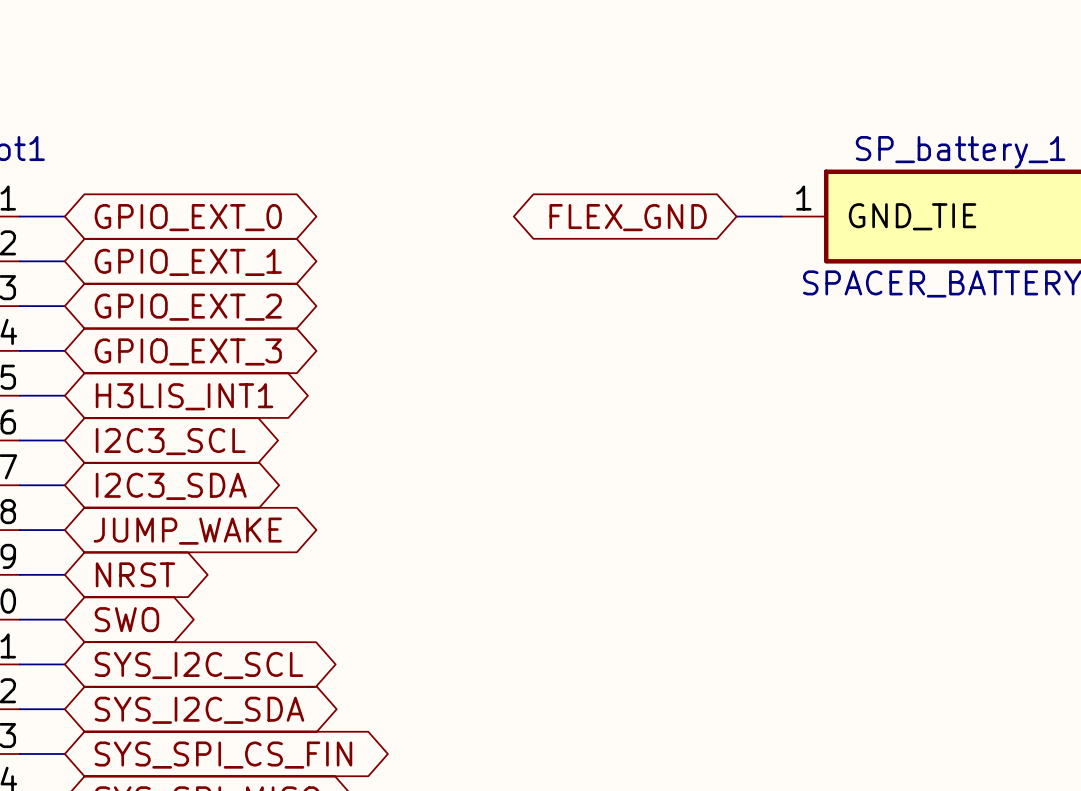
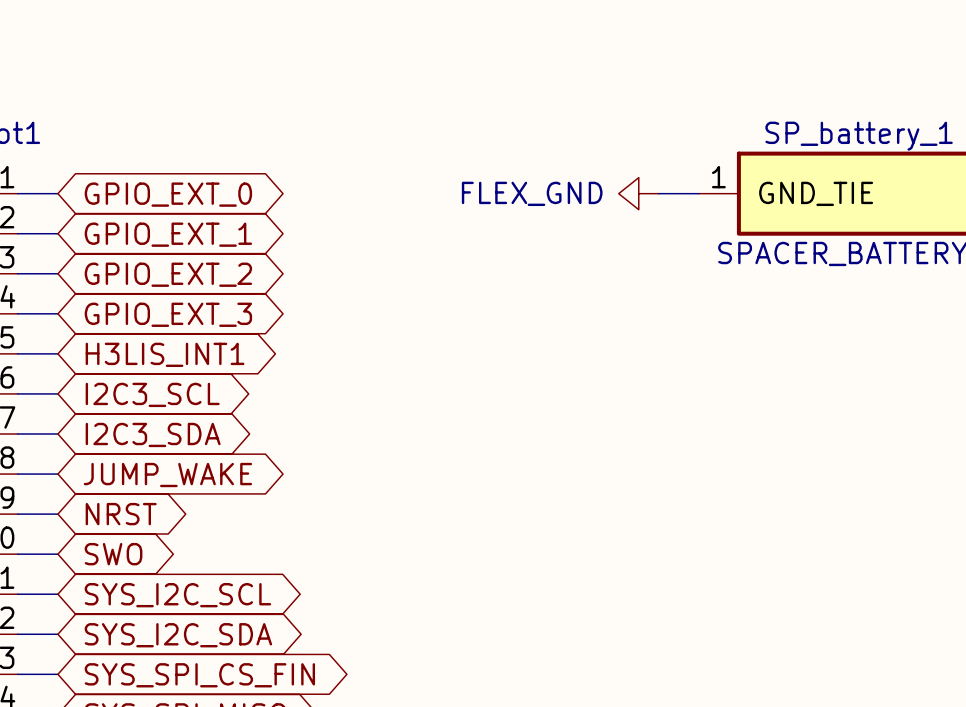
power symbol: none -> FLEX_GND (638, 193)
global label: FLEX_GND (628, 217) -> none

